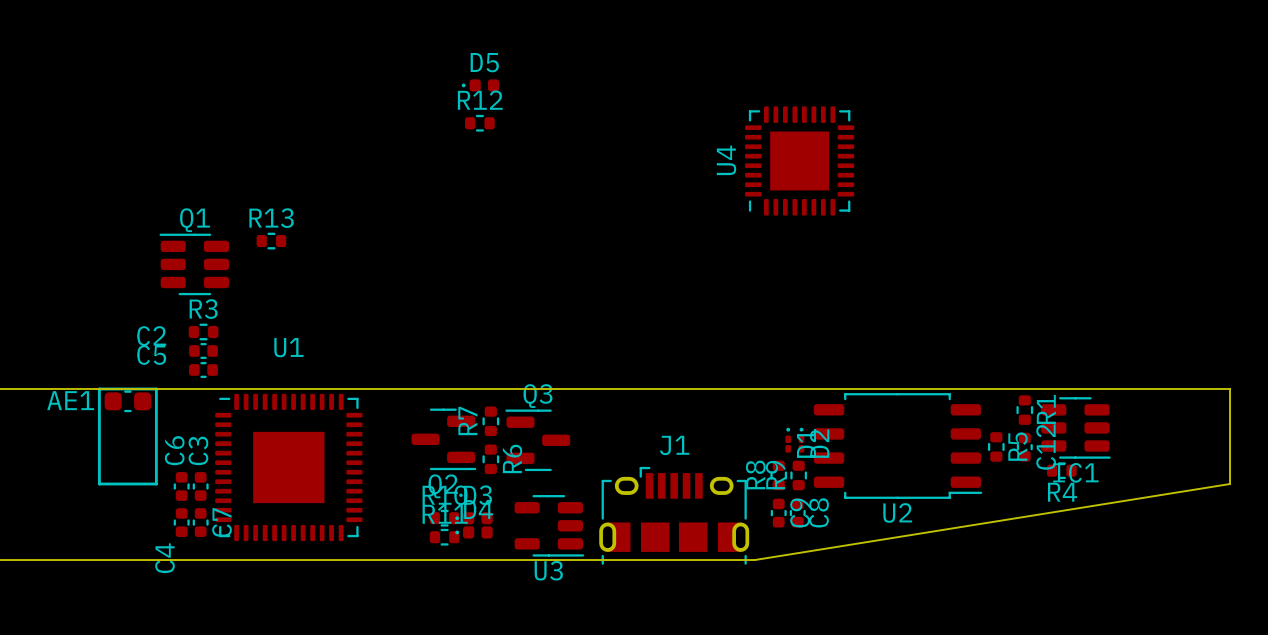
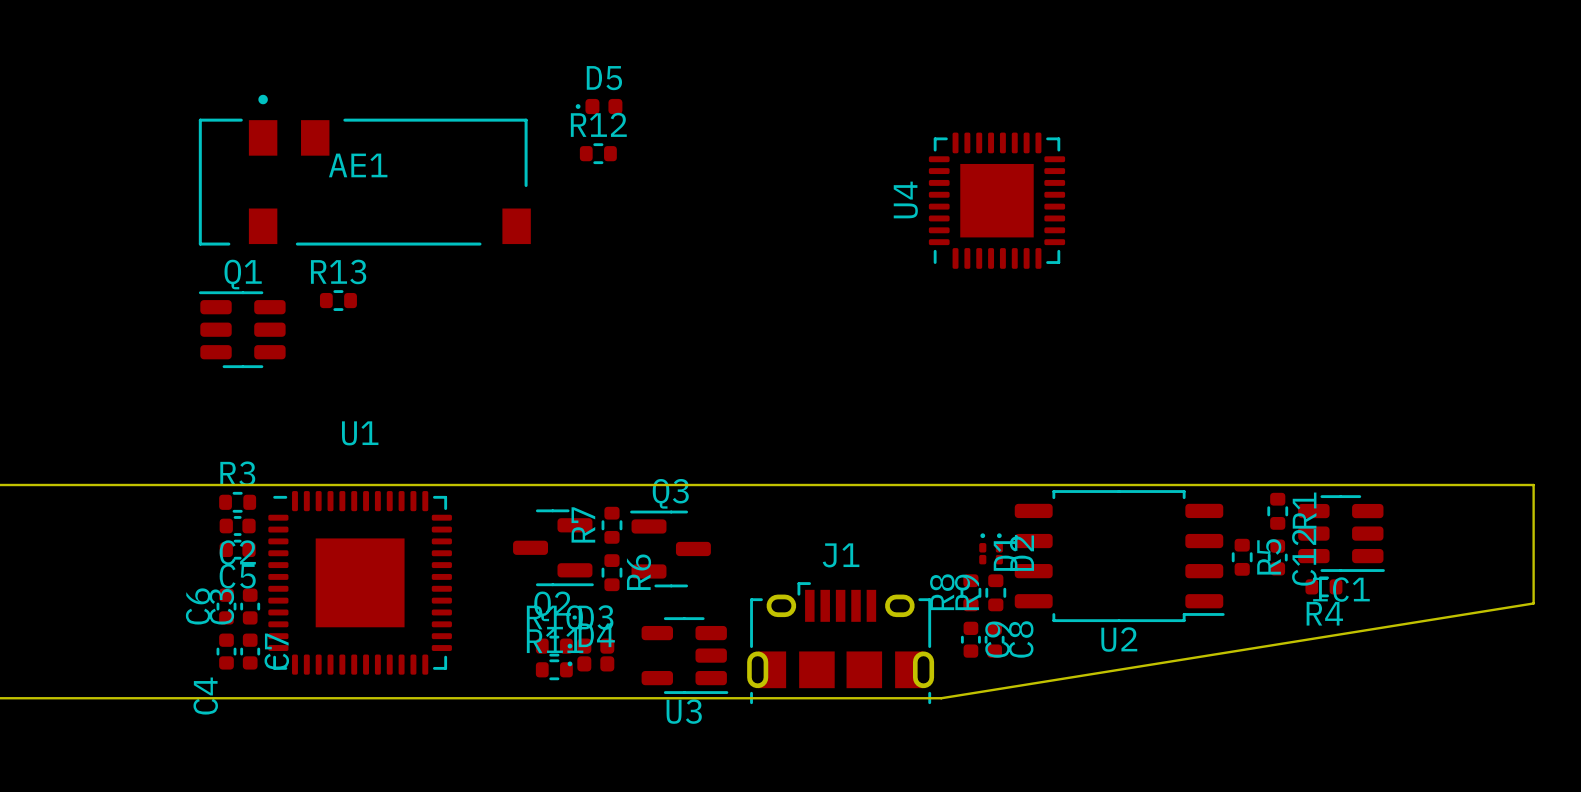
R3 position: (203, 331) -> (237, 502)
C2 name position: C2 (151, 336) -> C2 (237, 552)
C2 position: (203, 350) -> (237, 525)
C5 name position: C5 (151, 355) -> C5 (237, 576)
C5 position: (203, 369) -> (237, 549)
line: (99, 388) (99, 484) (156, 484) (156, 388) (99, 388) -> none
AE1 footprint: [104, 390, 152, 413] -> [198, 94, 531, 246]
AE1 name position: AE1 (70, 400) -> AE1 (358, 165)
C6 name position: C6 (174, 450) -> C6 (198, 606)
C3 name position: C3 (198, 450) -> C3 (221, 606)

